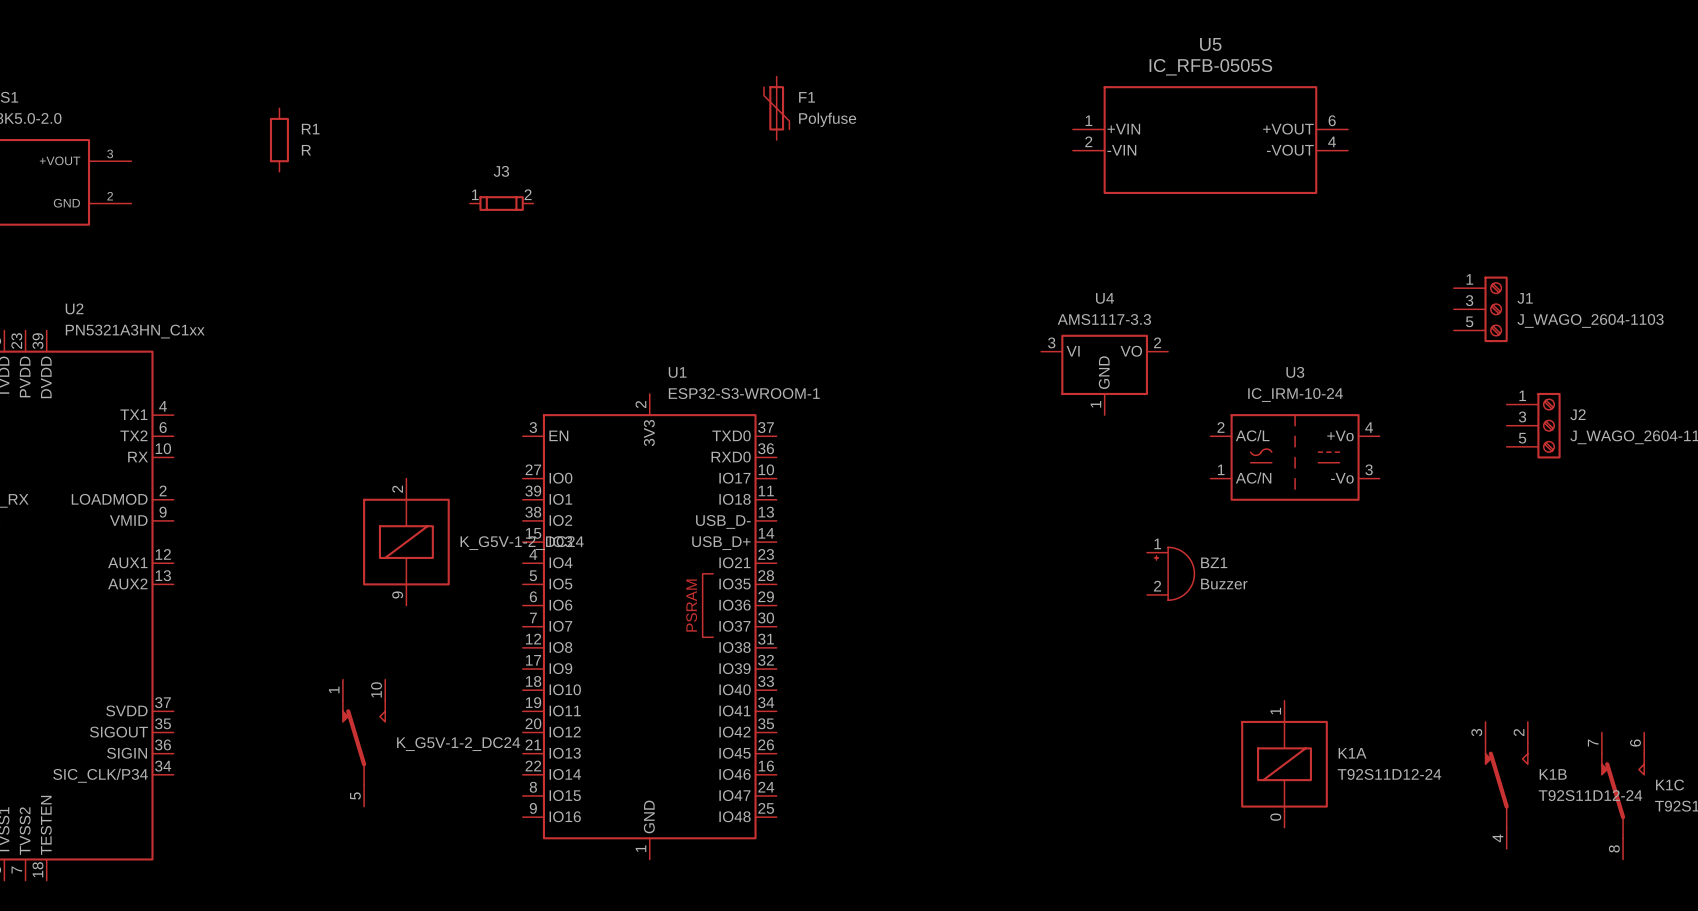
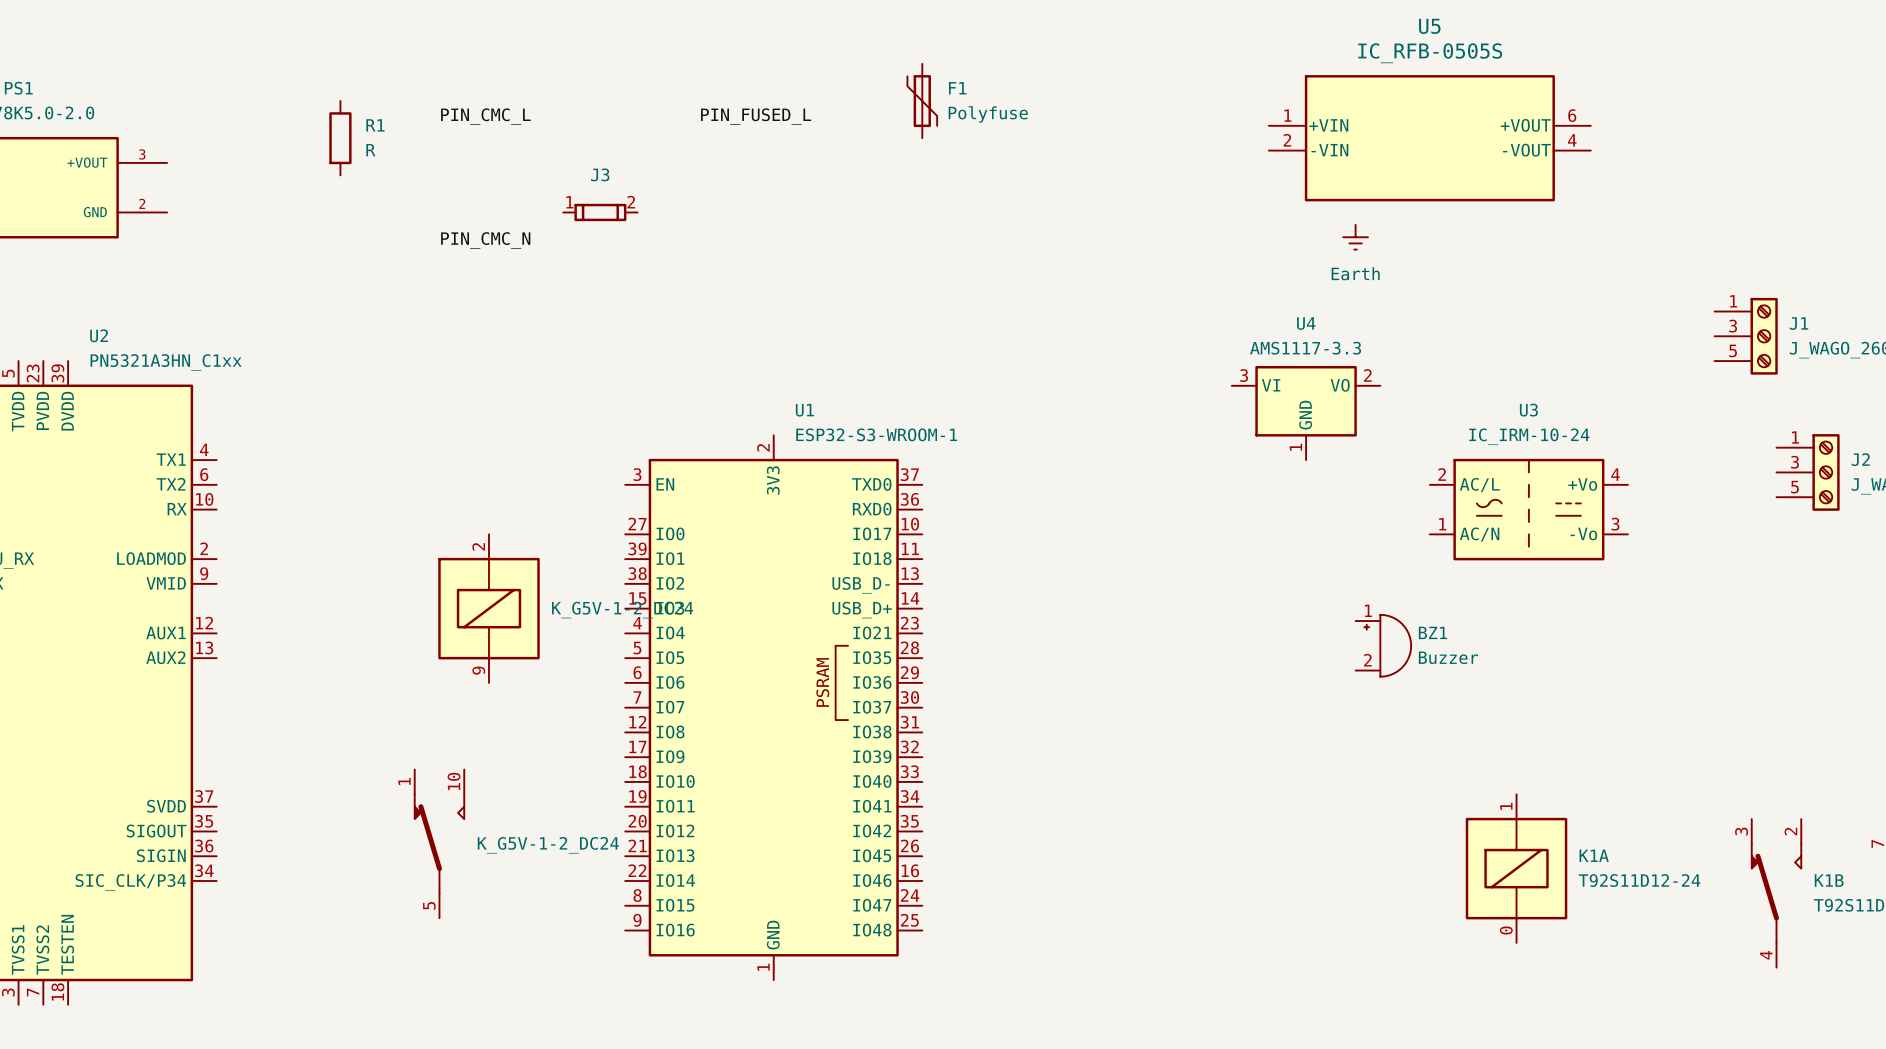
label: none -> PIN_CMC_L (485, 116)
label: none -> PIN_FUSED_L (756, 116)
power symbol: none -> Earth (1355, 237)
label: none -> PIN_CMC_N (485, 240)

